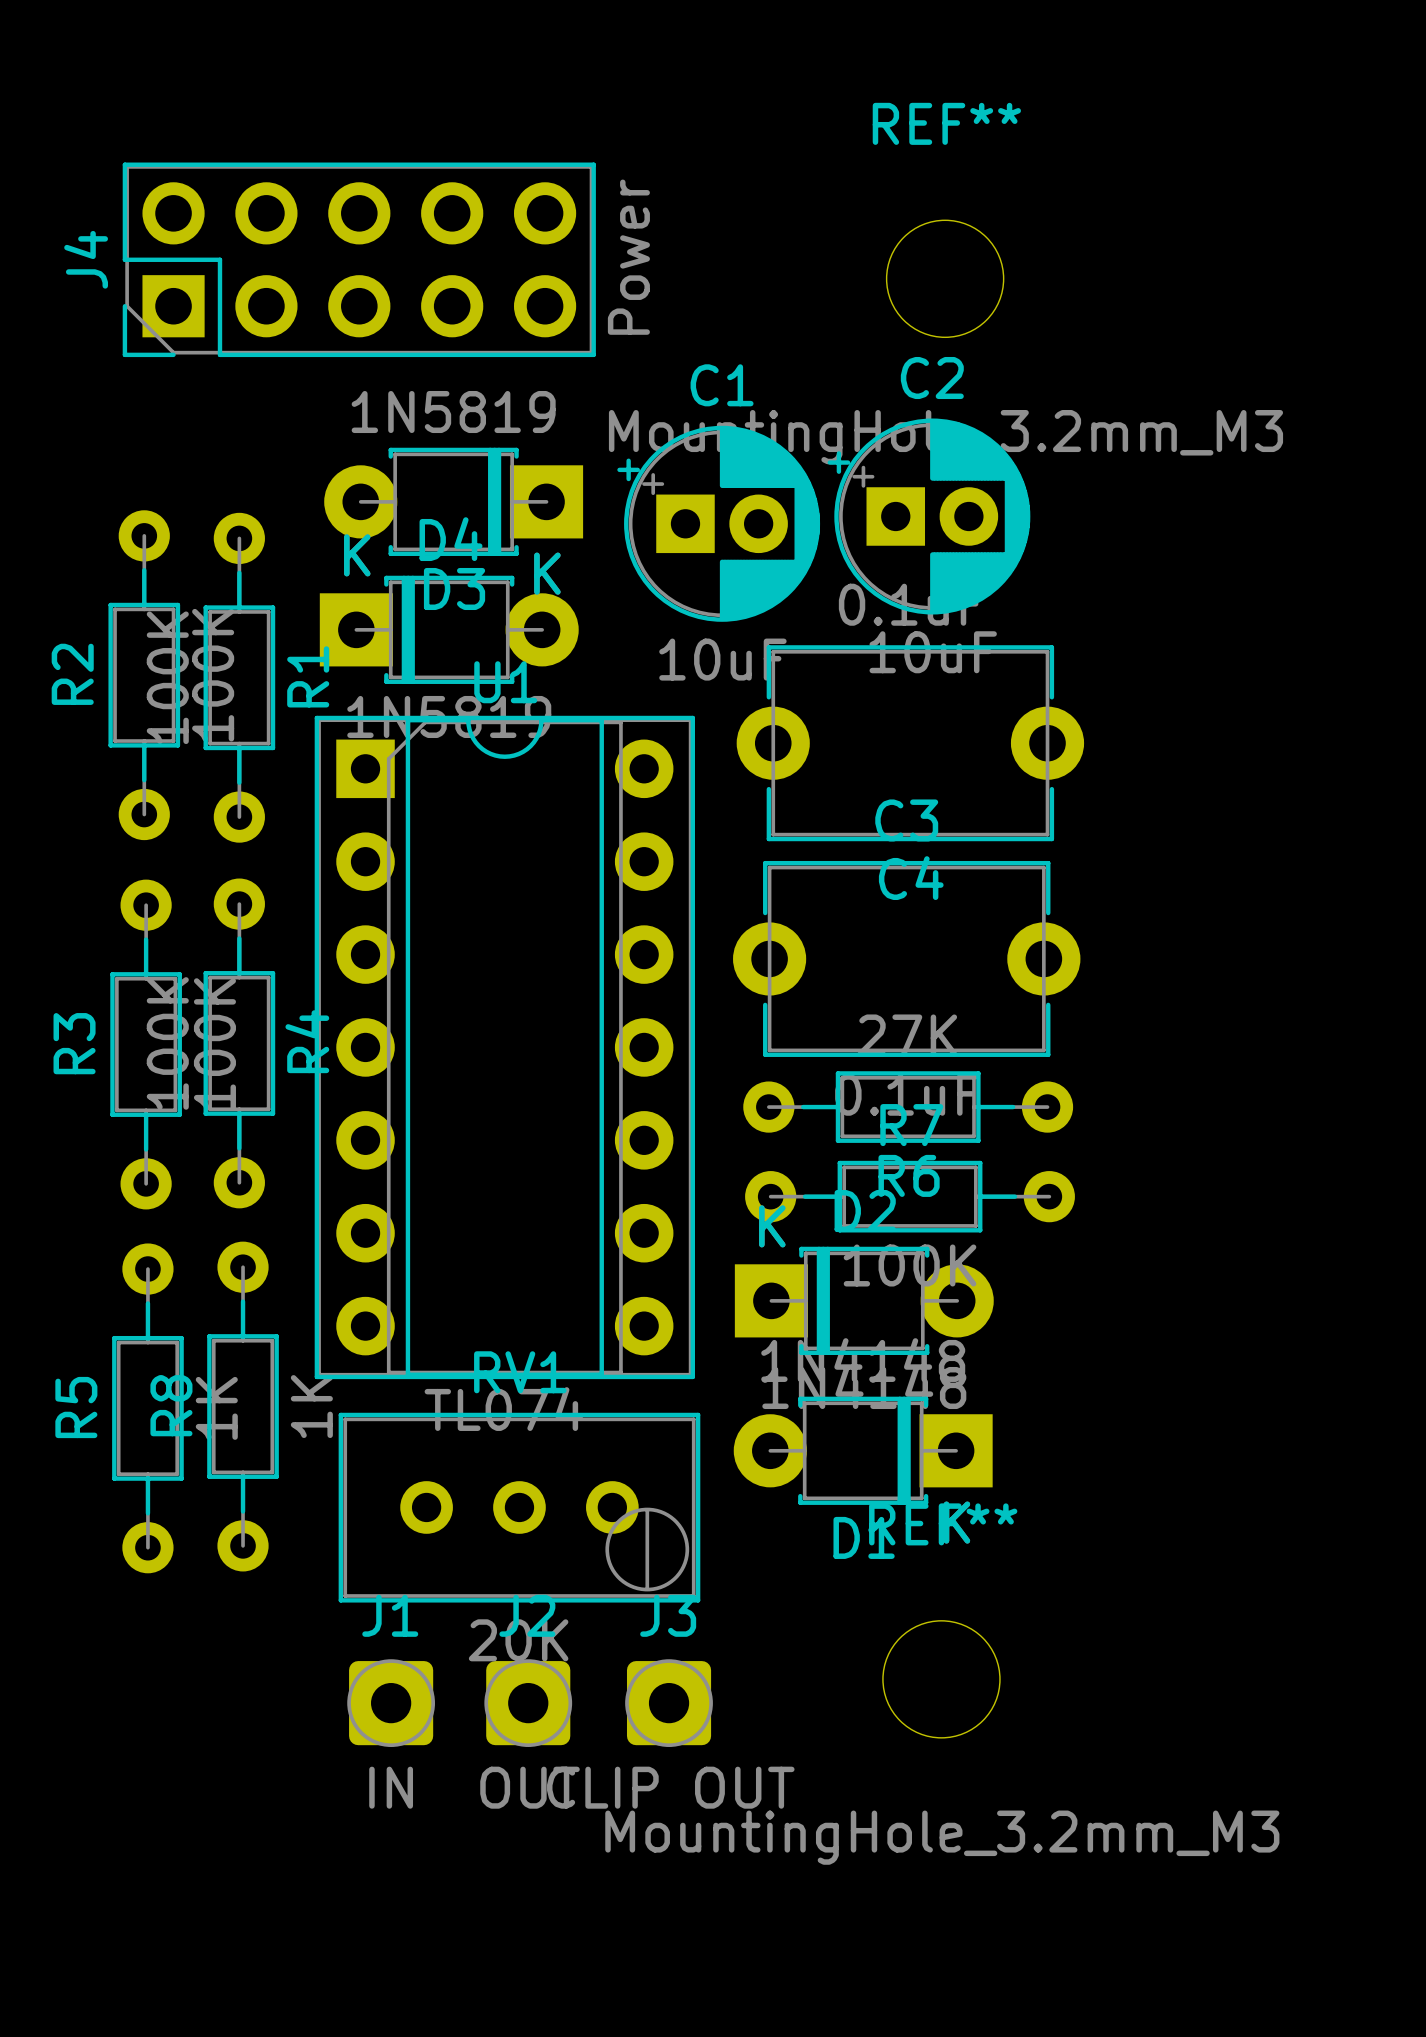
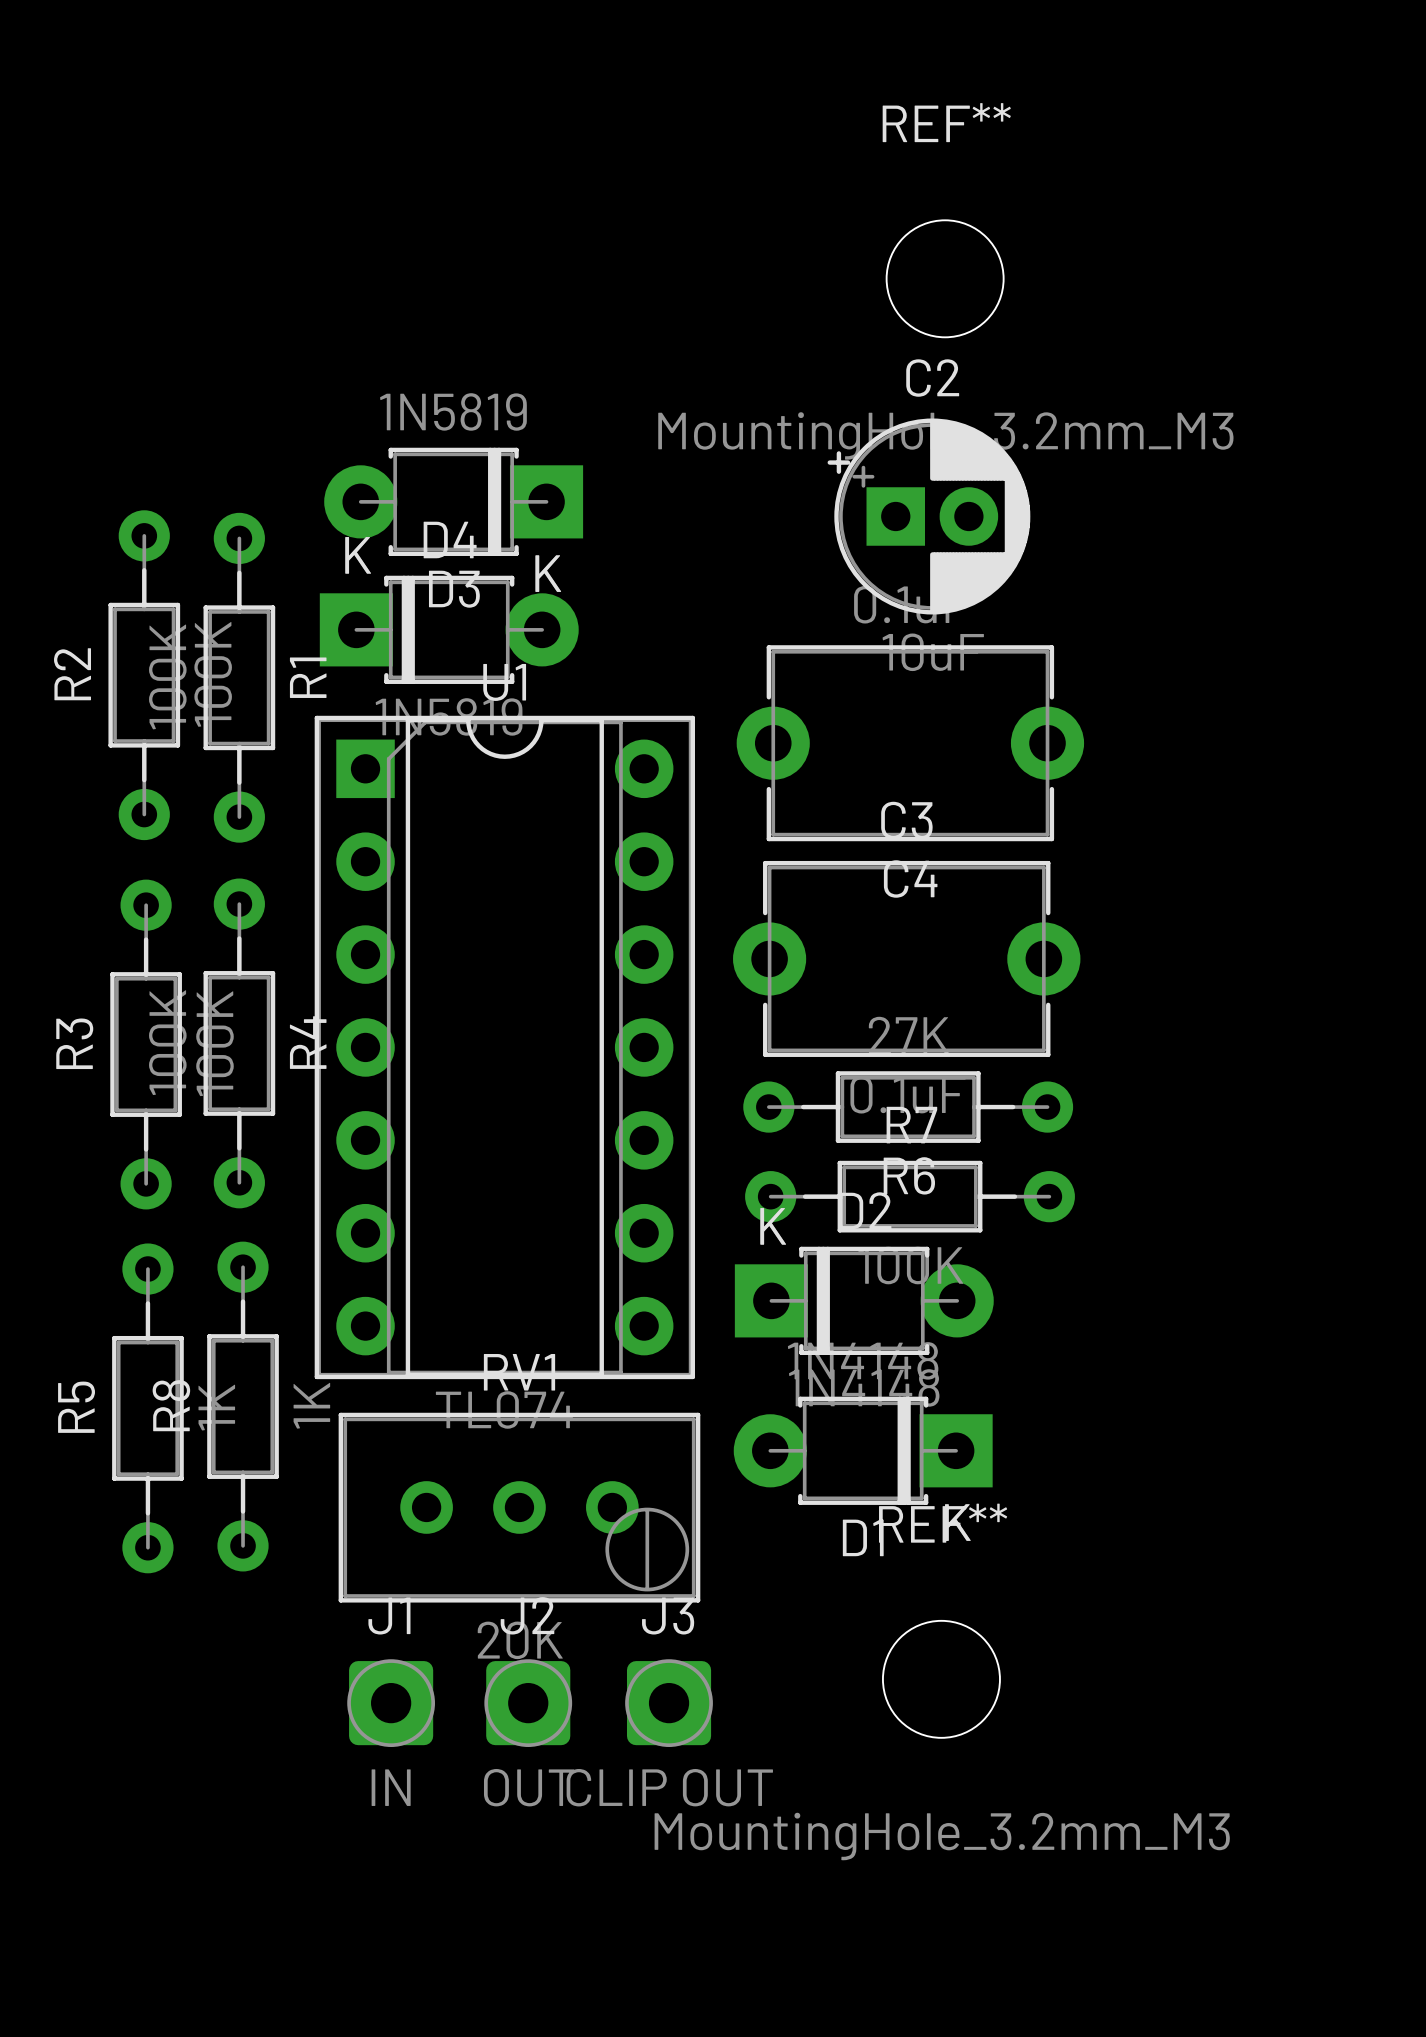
J4: Power (359, 259) -> none
C1: 10uF (718, 523) -> none

